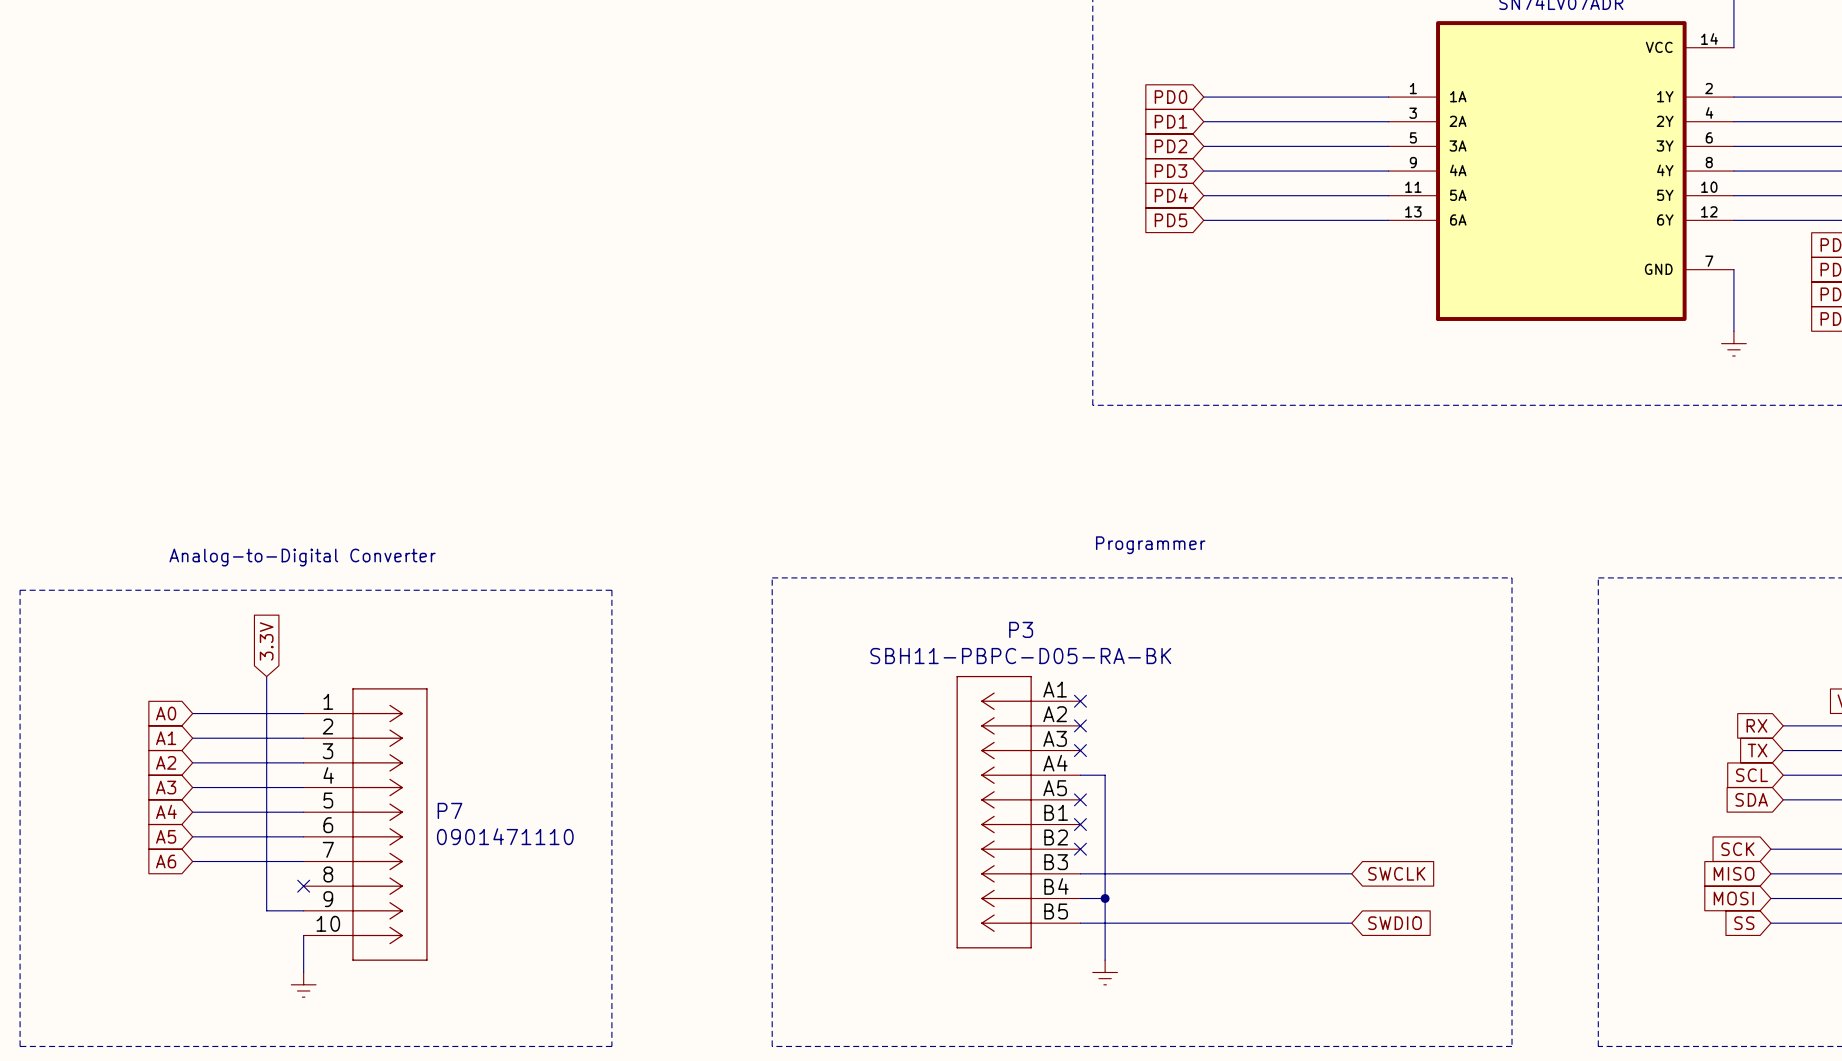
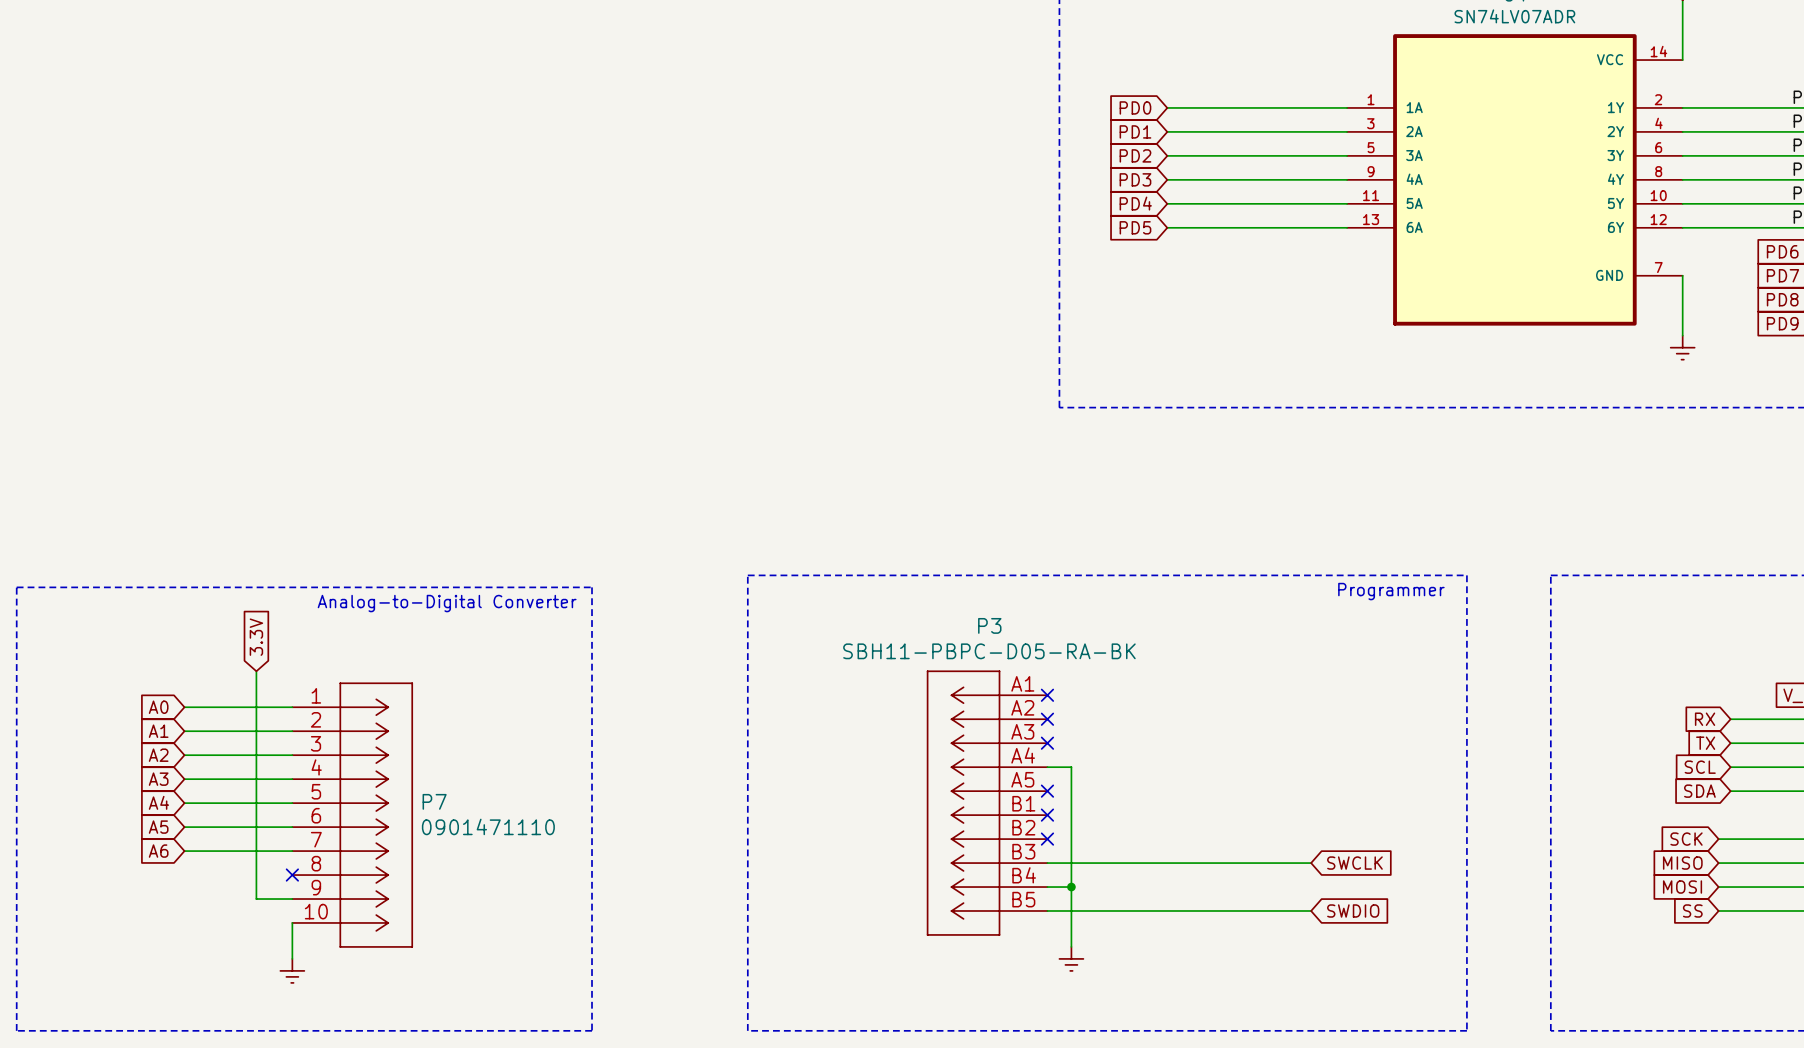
text: Programmer (1150, 545) -> none
text position: Analog-to-Digital Converter (302, 557) -> Analog-to-Digital Converter (447, 603)
text: none -> Programmer (1391, 591)

